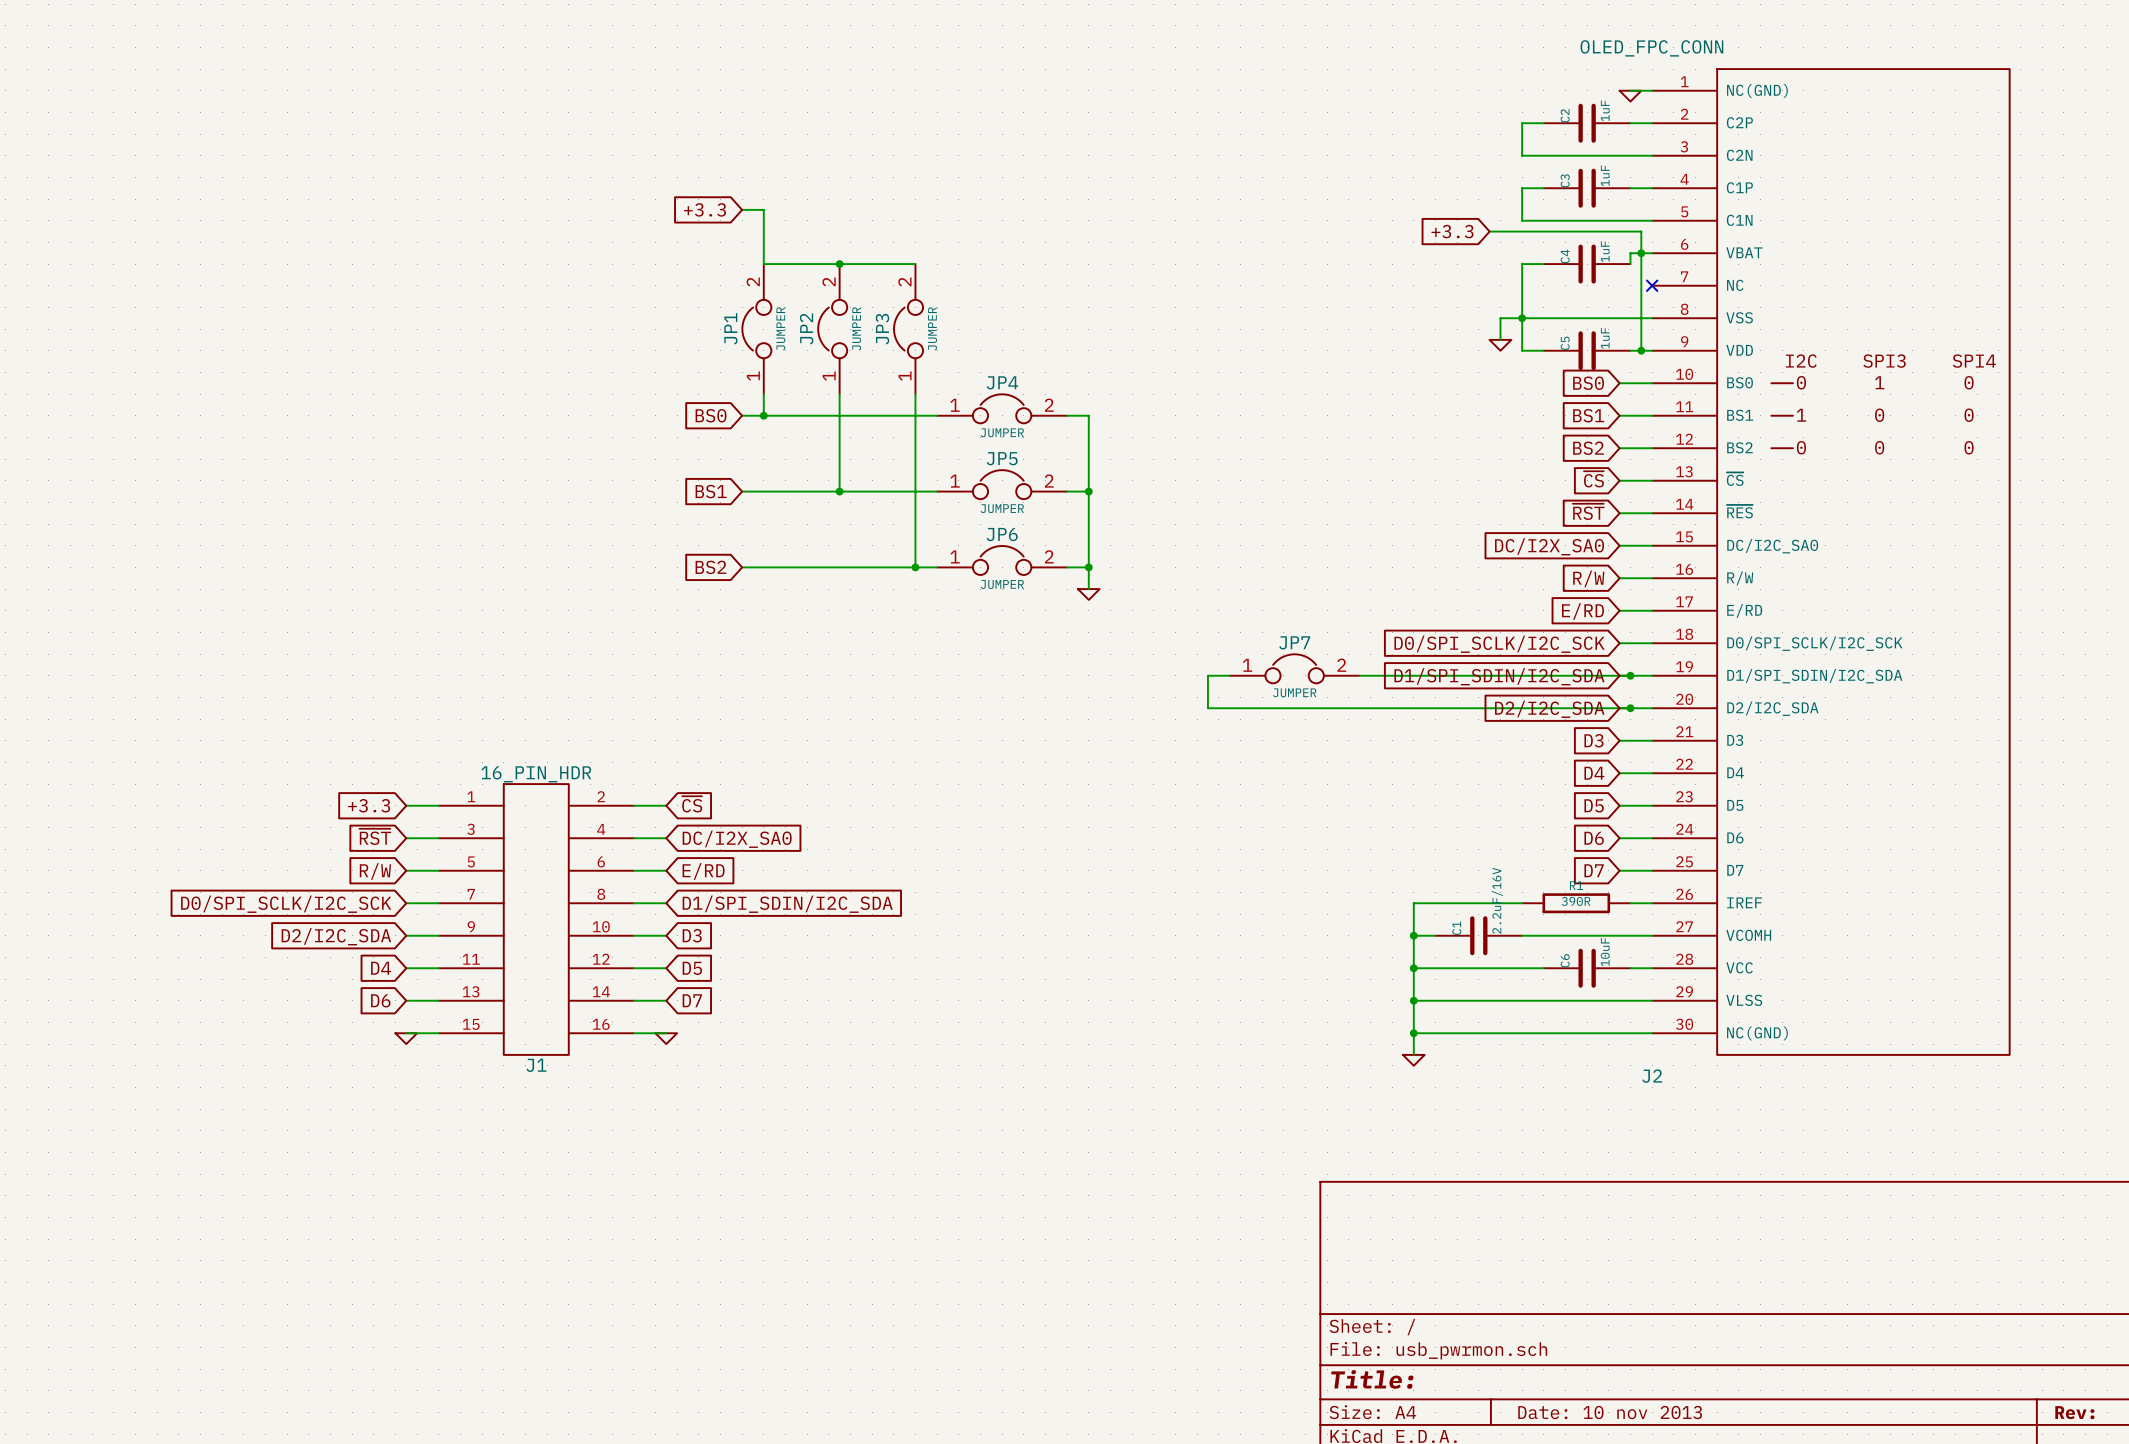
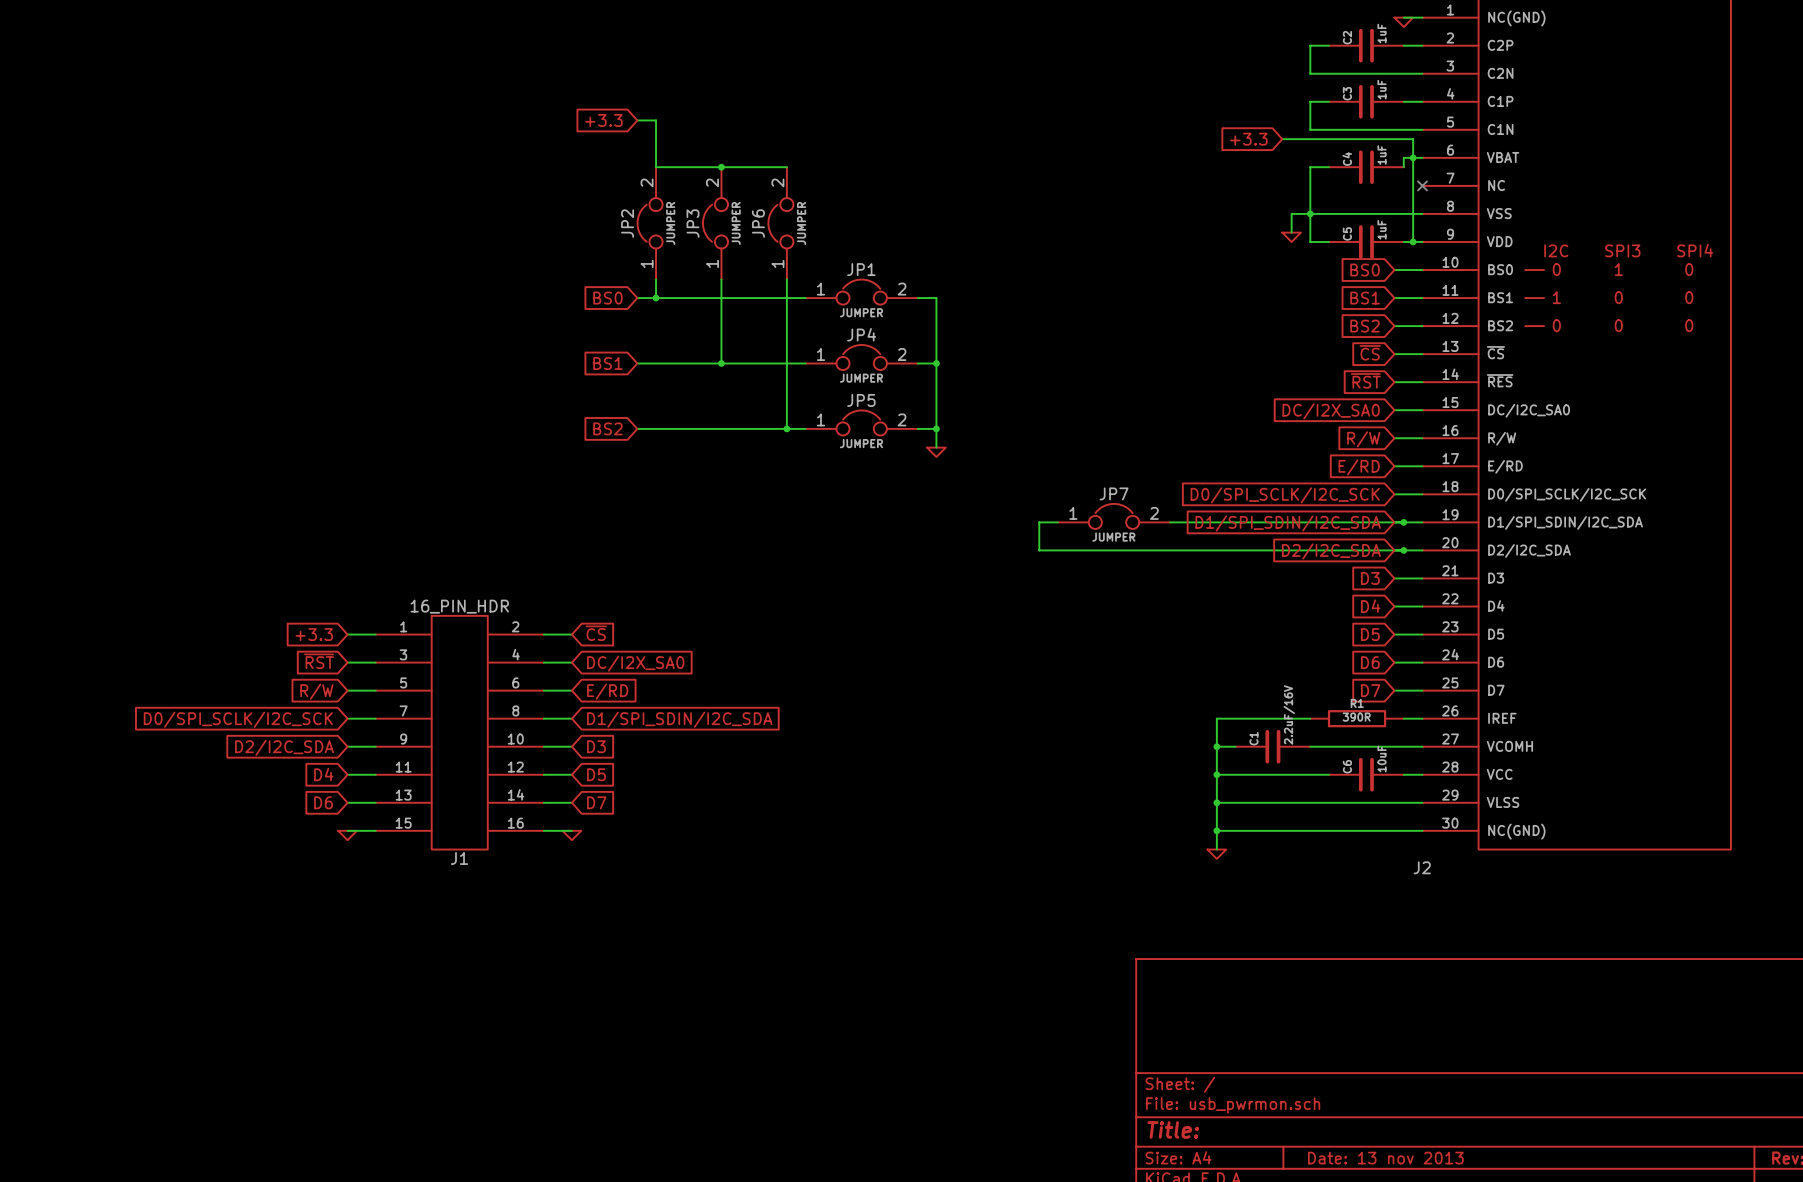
JP1 name: JP1 (730, 328) -> JP2 (627, 223)
JP2 name: JP2 (806, 328) -> JP3 (693, 223)
JP3 name: JP3 (882, 329) -> JP6 (758, 223)
JP4 name: JP4 (1002, 382) -> JP1 (861, 269)
JP5 name: JP5 (1002, 458) -> JP4 (861, 334)
JP6 name: JP6 (1002, 534) -> JP5 (861, 400)
title block: Date: 10 nov 2013 (1610, 1412) -> Date: 13 nov 2013 (1385, 1158)

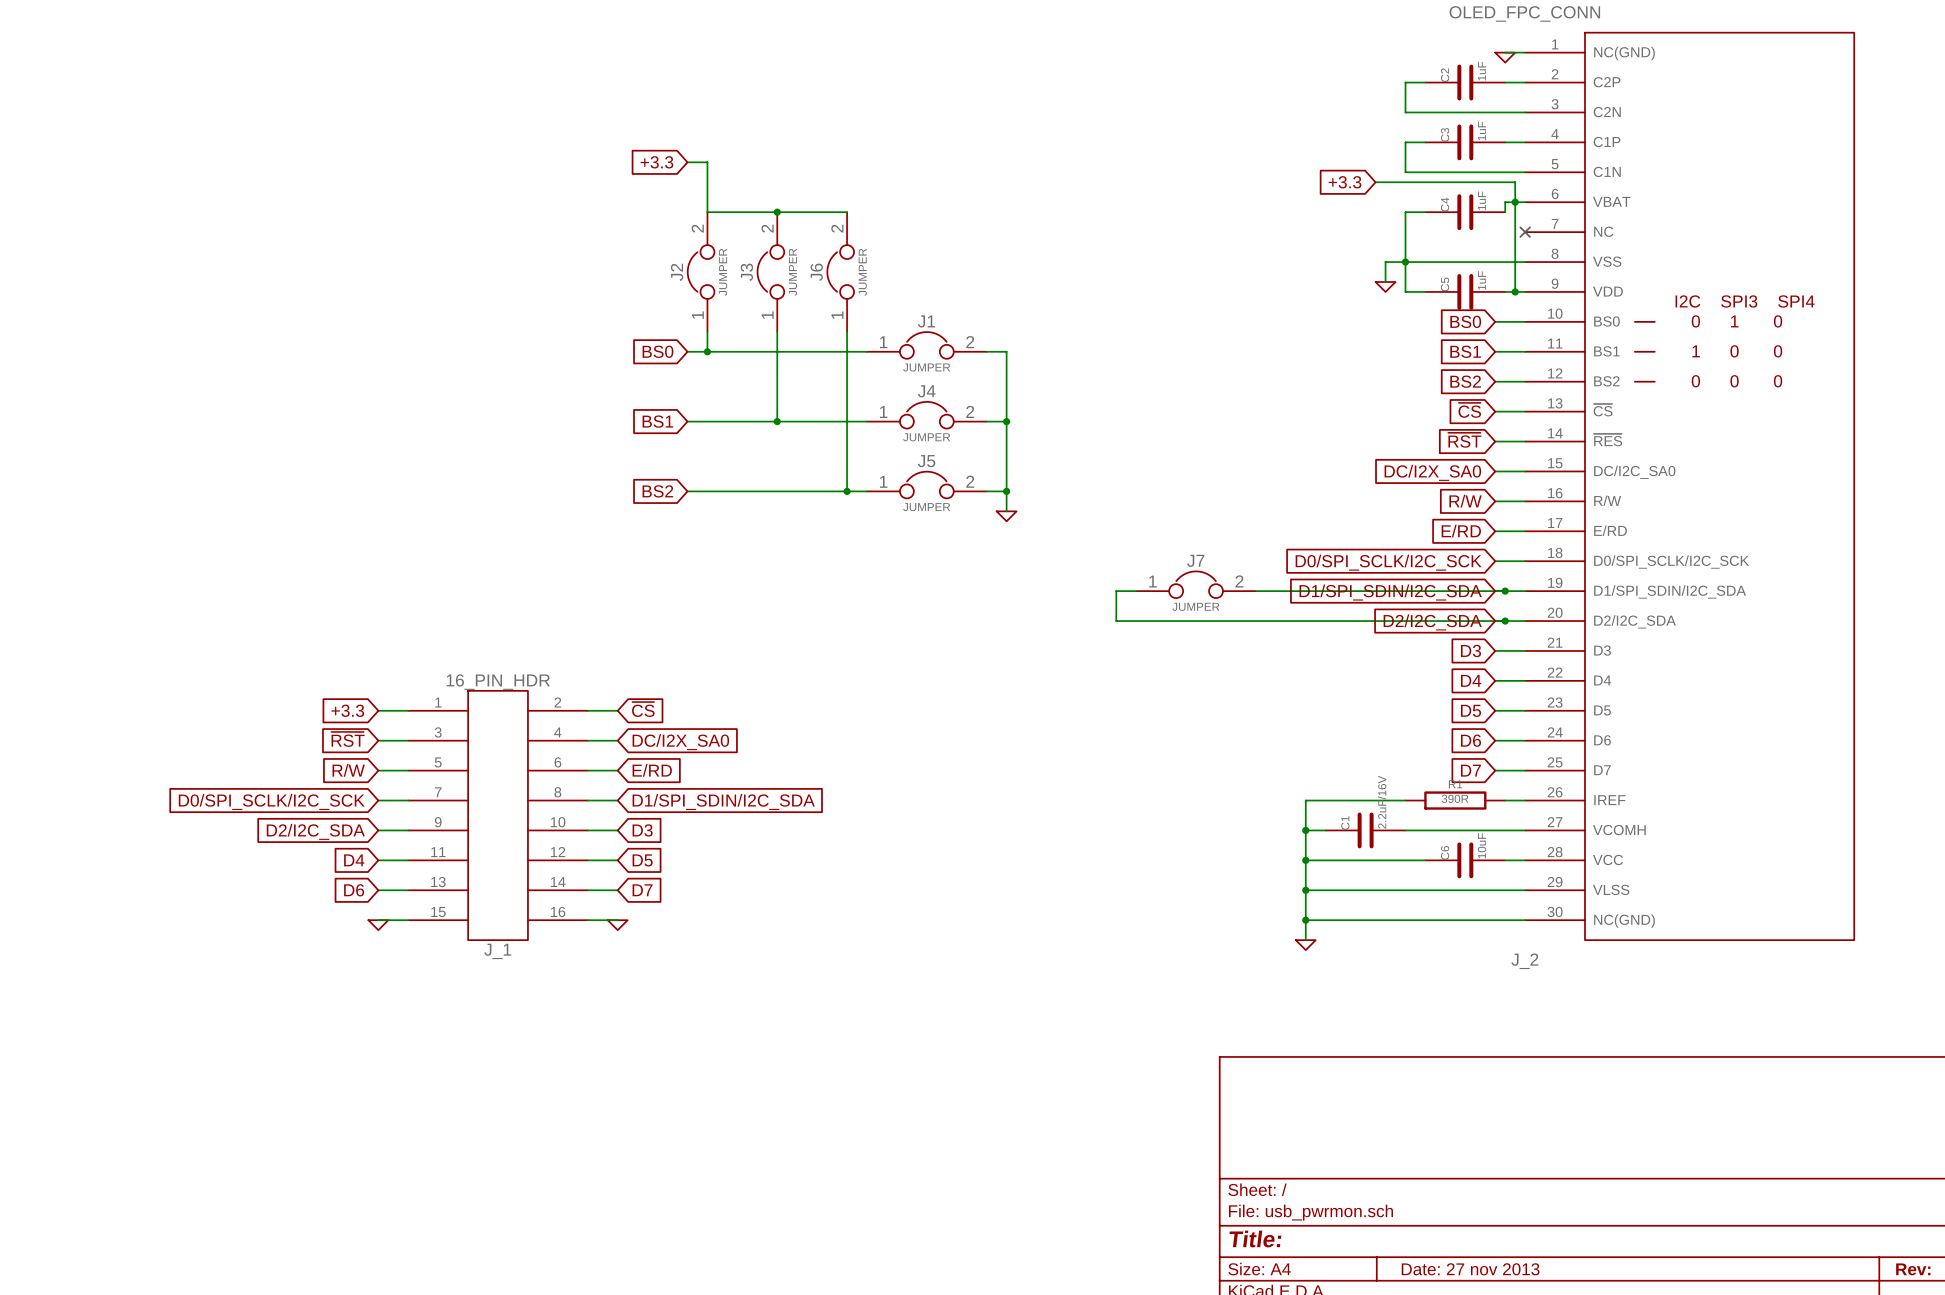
JP2 name: JP2 (627, 223) -> J2 (677, 272)
JP3 name: JP3 (693, 223) -> J3 (746, 272)
JP6 name: JP6 (758, 223) -> J6 (816, 272)
JP1 name: JP1 (861, 269) -> J1 (926, 321)
JP4 name: JP4 (861, 334) -> J4 (926, 391)
JP5 name: JP5 (861, 400) -> J5 (926, 461)
JP7 name: JP7 (1114, 493) -> J7 (1195, 560)
J1 name: J1 (459, 858) -> J_1 (497, 951)
J2 name: J2 (1422, 867) -> J_2 (1524, 961)
title block: Date: 13 nov 2013 (1385, 1158) -> Date: 27 nov 2013 (1470, 1269)

